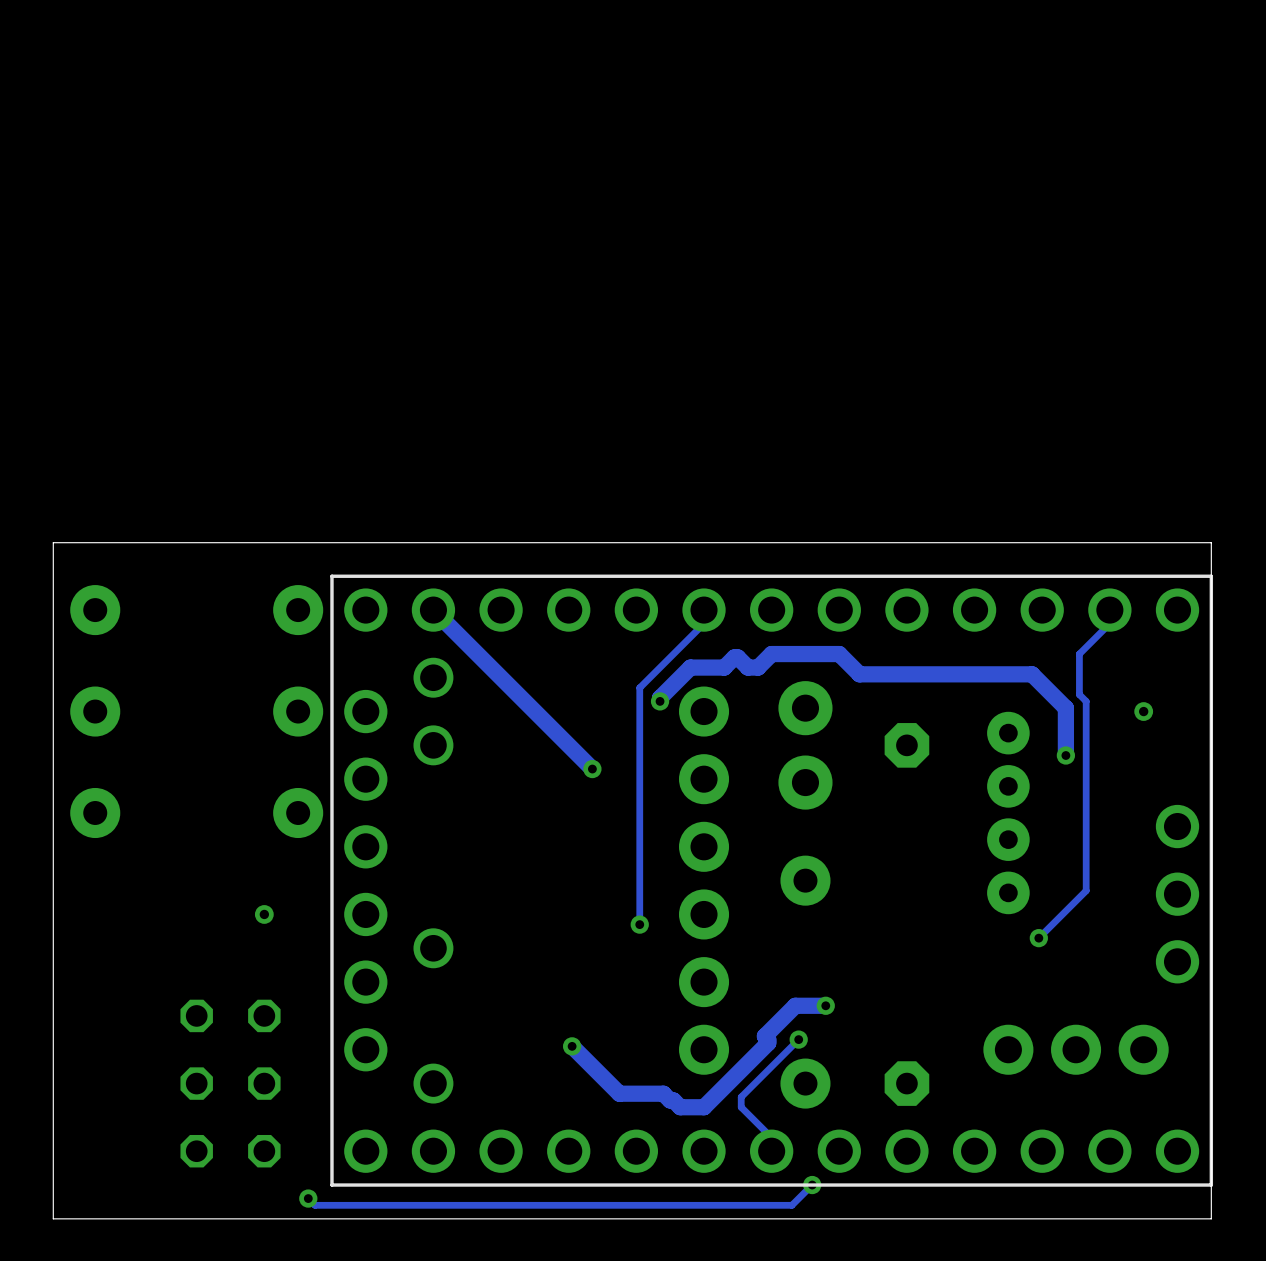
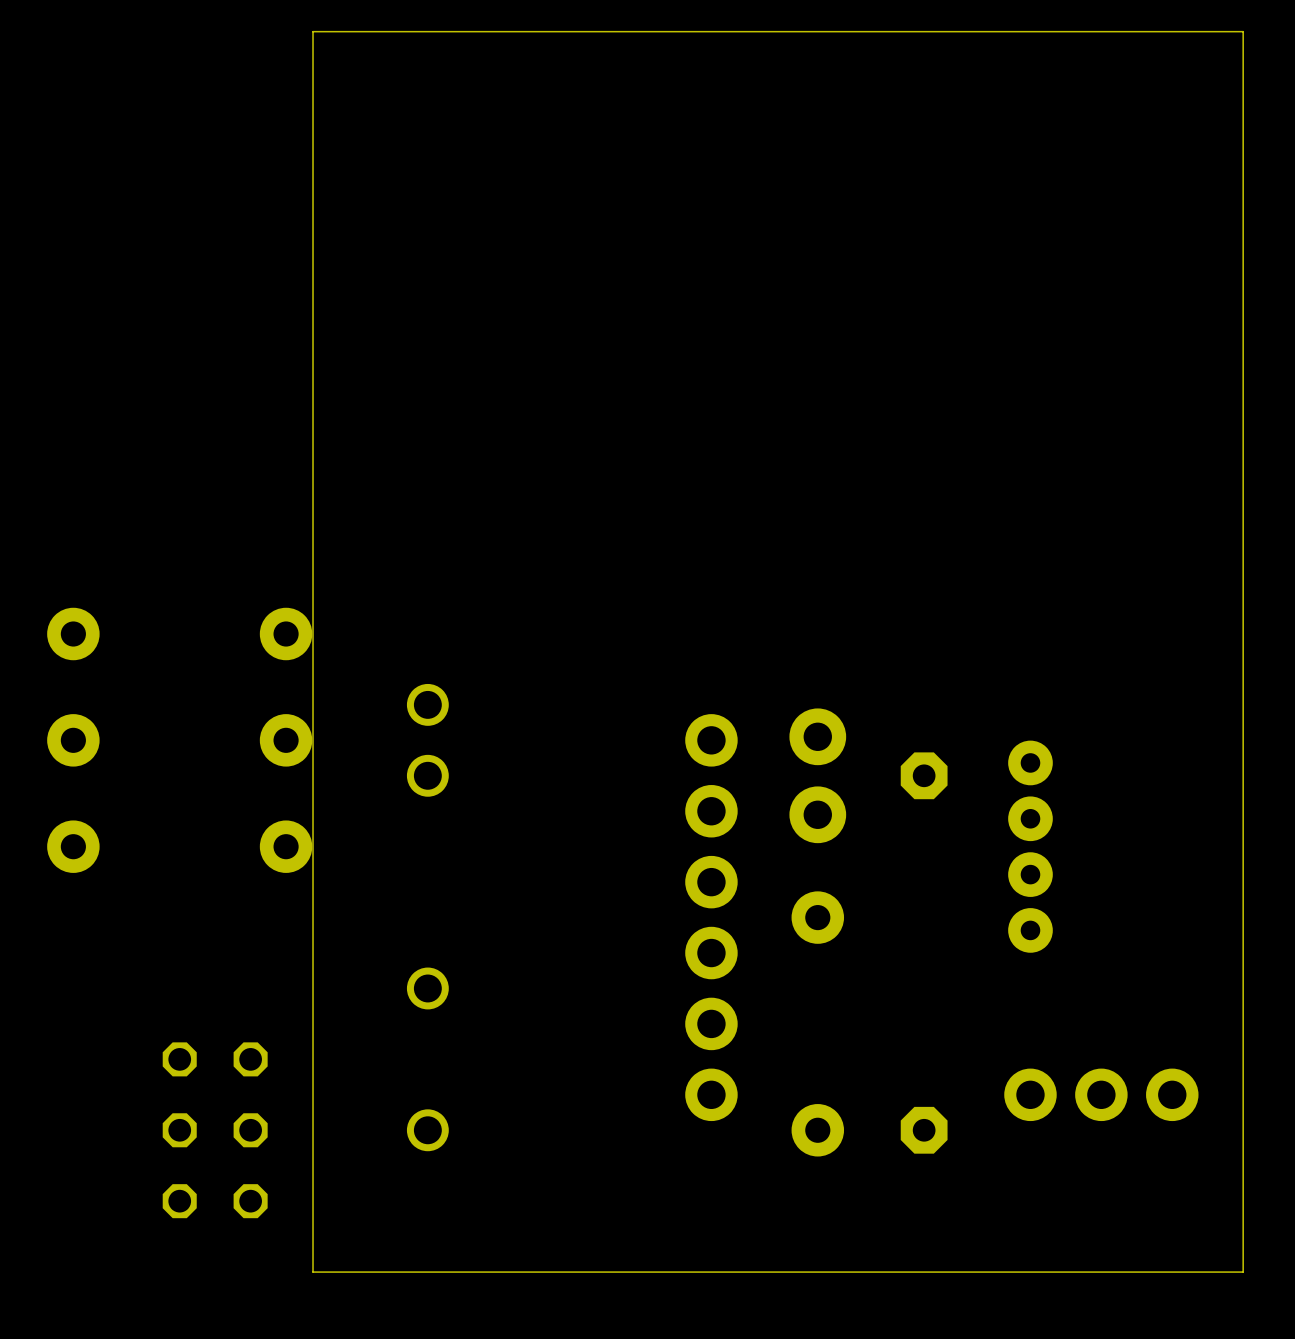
board edge: (1211, 542) (53, 542) (53, 1218) (323, 1218) -> (1243, 563) (1243, 31) (313, 31) (313, 1272)
track: (433, 610) (592, 769) -> none
track: (704, 610) (704, 623) (639, 687) (639, 924) -> none
track: (1109, 610) (1109, 623) (1079, 654) (1079, 694) (1086, 701) (1086, 890) (1038, 938) -> none
track: (660, 701) (660, 698) (690, 667) (724, 667) (734, 657) (737, 657) (747, 667) (758, 667) (771, 654) (839, 654) (859, 674) (1032, 674) (1065, 708) (1065, 755) -> none
via: (660, 701) -> none
via: (1143, 711) -> none
via: (1065, 755) -> none
via: (592, 769) -> none
part: (771, 880) -> none
via: (264, 914) -> none
via: (639, 924) -> none
via: (1038, 938) -> none
track: (825, 1005) (795, 1005) (764, 1036) (768, 1039) (768, 1042) (704, 1107) (680, 1107) (663, 1093) (619, 1093) (572, 1046) -> none
via: (825, 1005) -> none
track: (798, 1039) (741, 1097) (741, 1107) (771, 1137) (771, 1151) -> none
via: (798, 1039) -> none
via: (572, 1046) -> none
track: (812, 1185) (791, 1205) (315, 1205) (308, 1198) -> none
via: (812, 1185) -> none
via: (308, 1198) -> none

